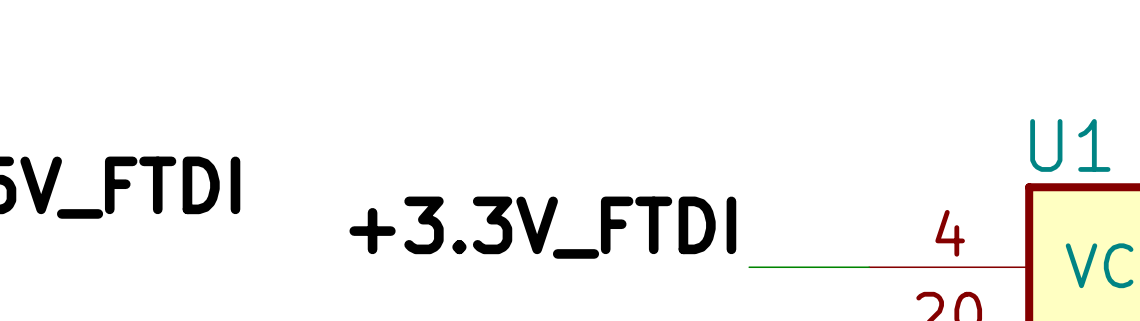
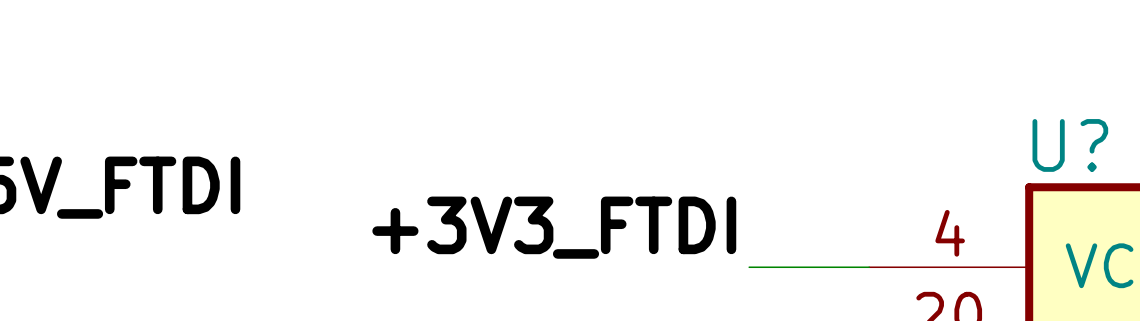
U1 name: U1 (1070, 145) -> U? (1070, 145)
label: +3.3V_FTDI (542, 227) -> +3V3_FTDI (554, 227)

